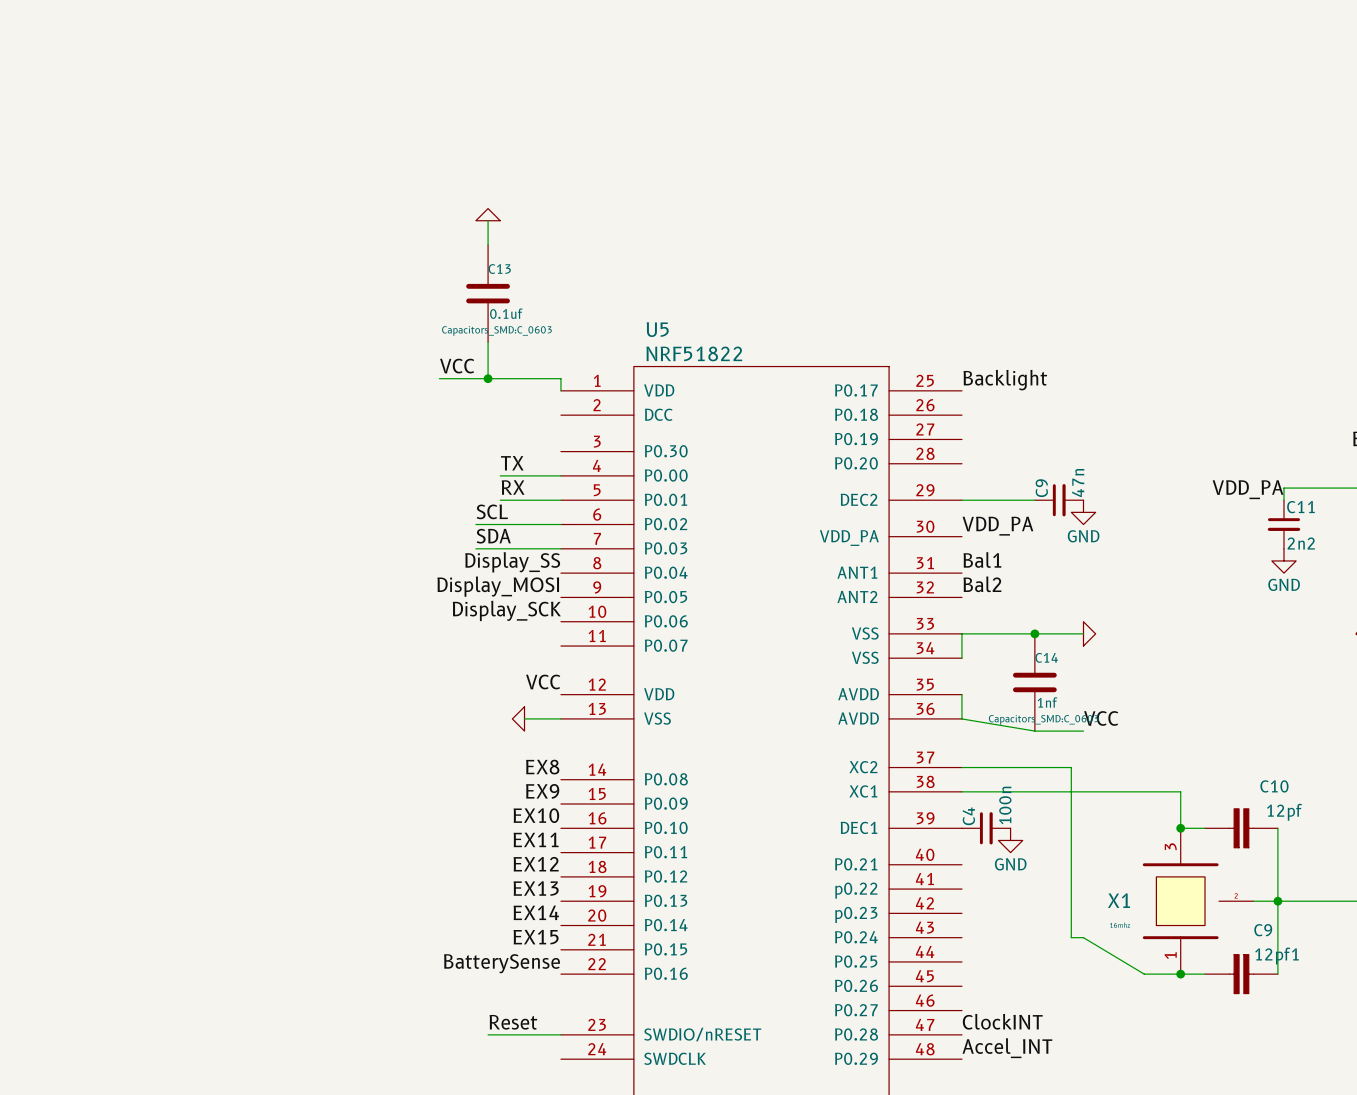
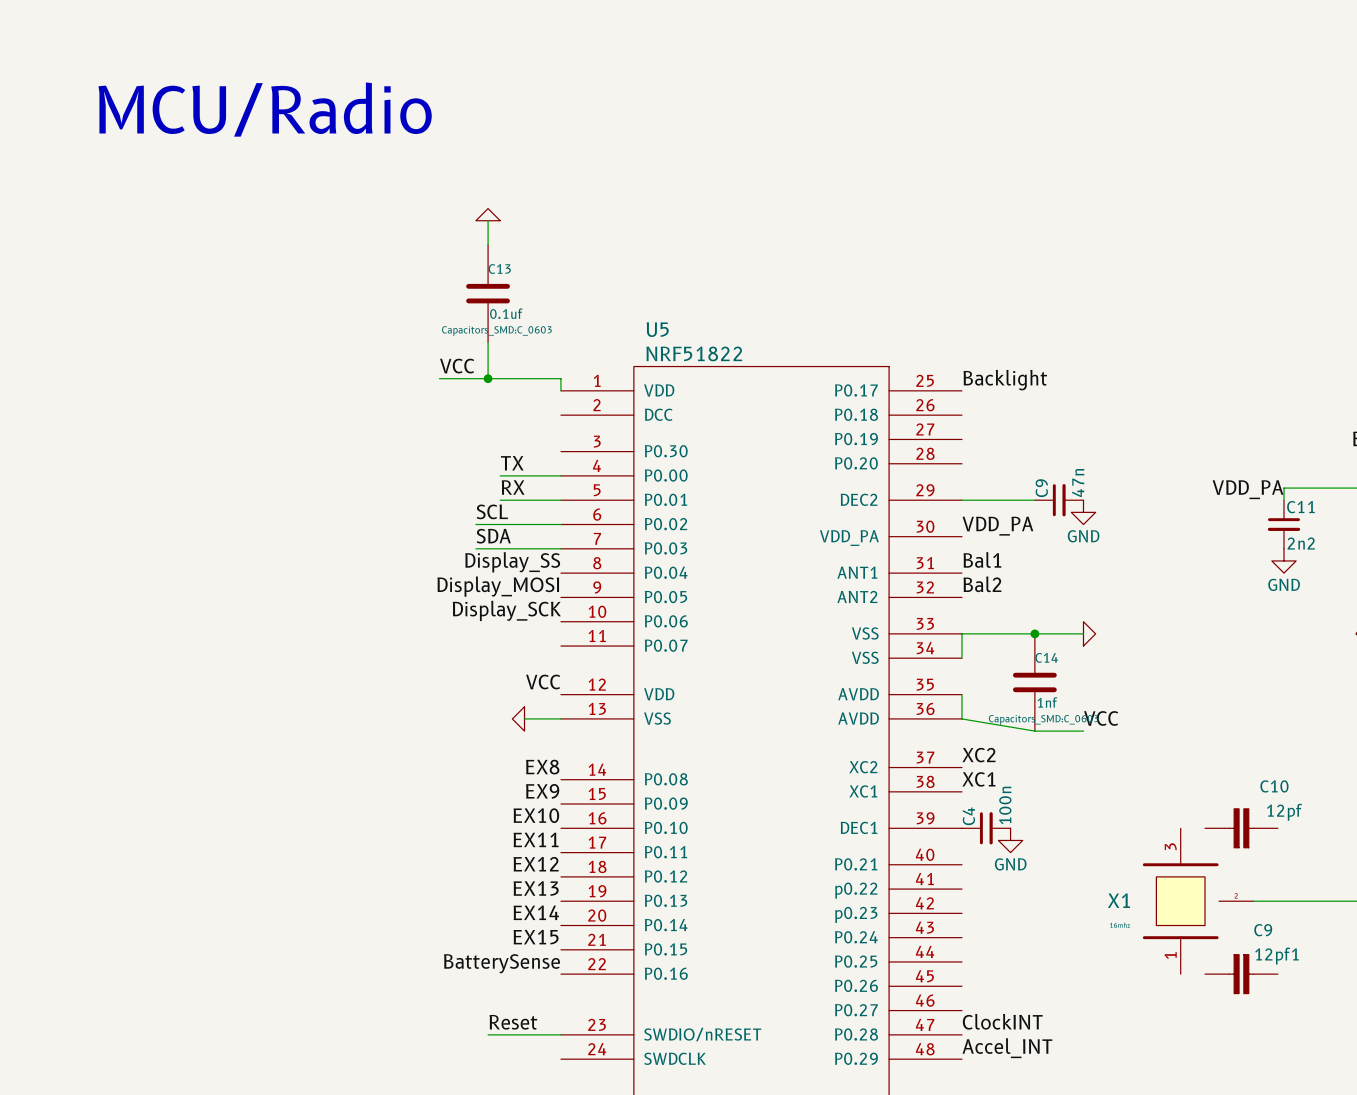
text: none -> MCU/Radio (265, 109)
label: none -> XC2 (978, 755)
wire: (961, 767) (1071, 767) (1071, 937) (1083, 937) (1144, 974) (1205, 974) -> none
label: none -> XC1 (978, 779)
wire: (961, 791) (1180, 791) (1180, 828) (1205, 828) -> none
junction: (1180, 828) -> none
wire: (1277, 828) (1277, 974) -> none
junction: (1277, 901) -> none
junction: (1180, 974) -> none

